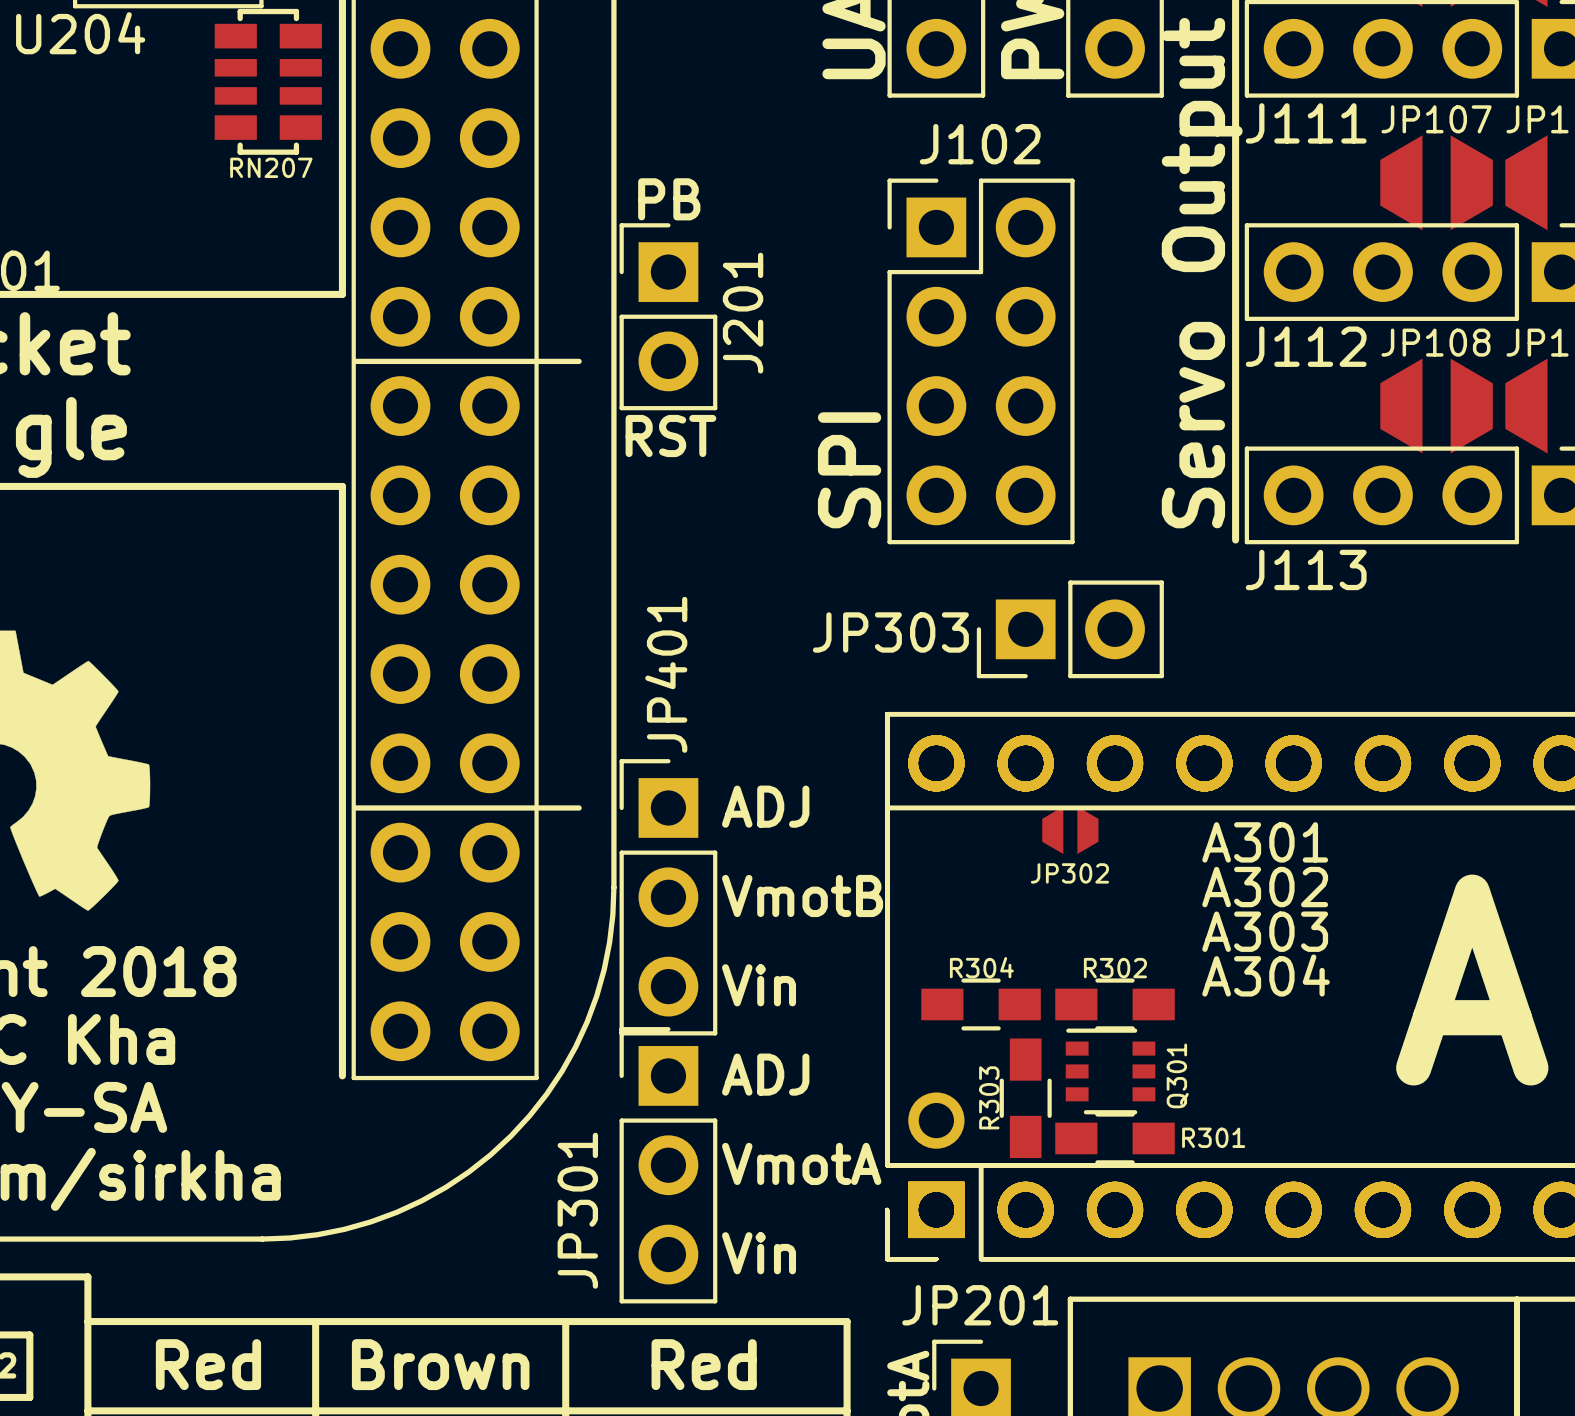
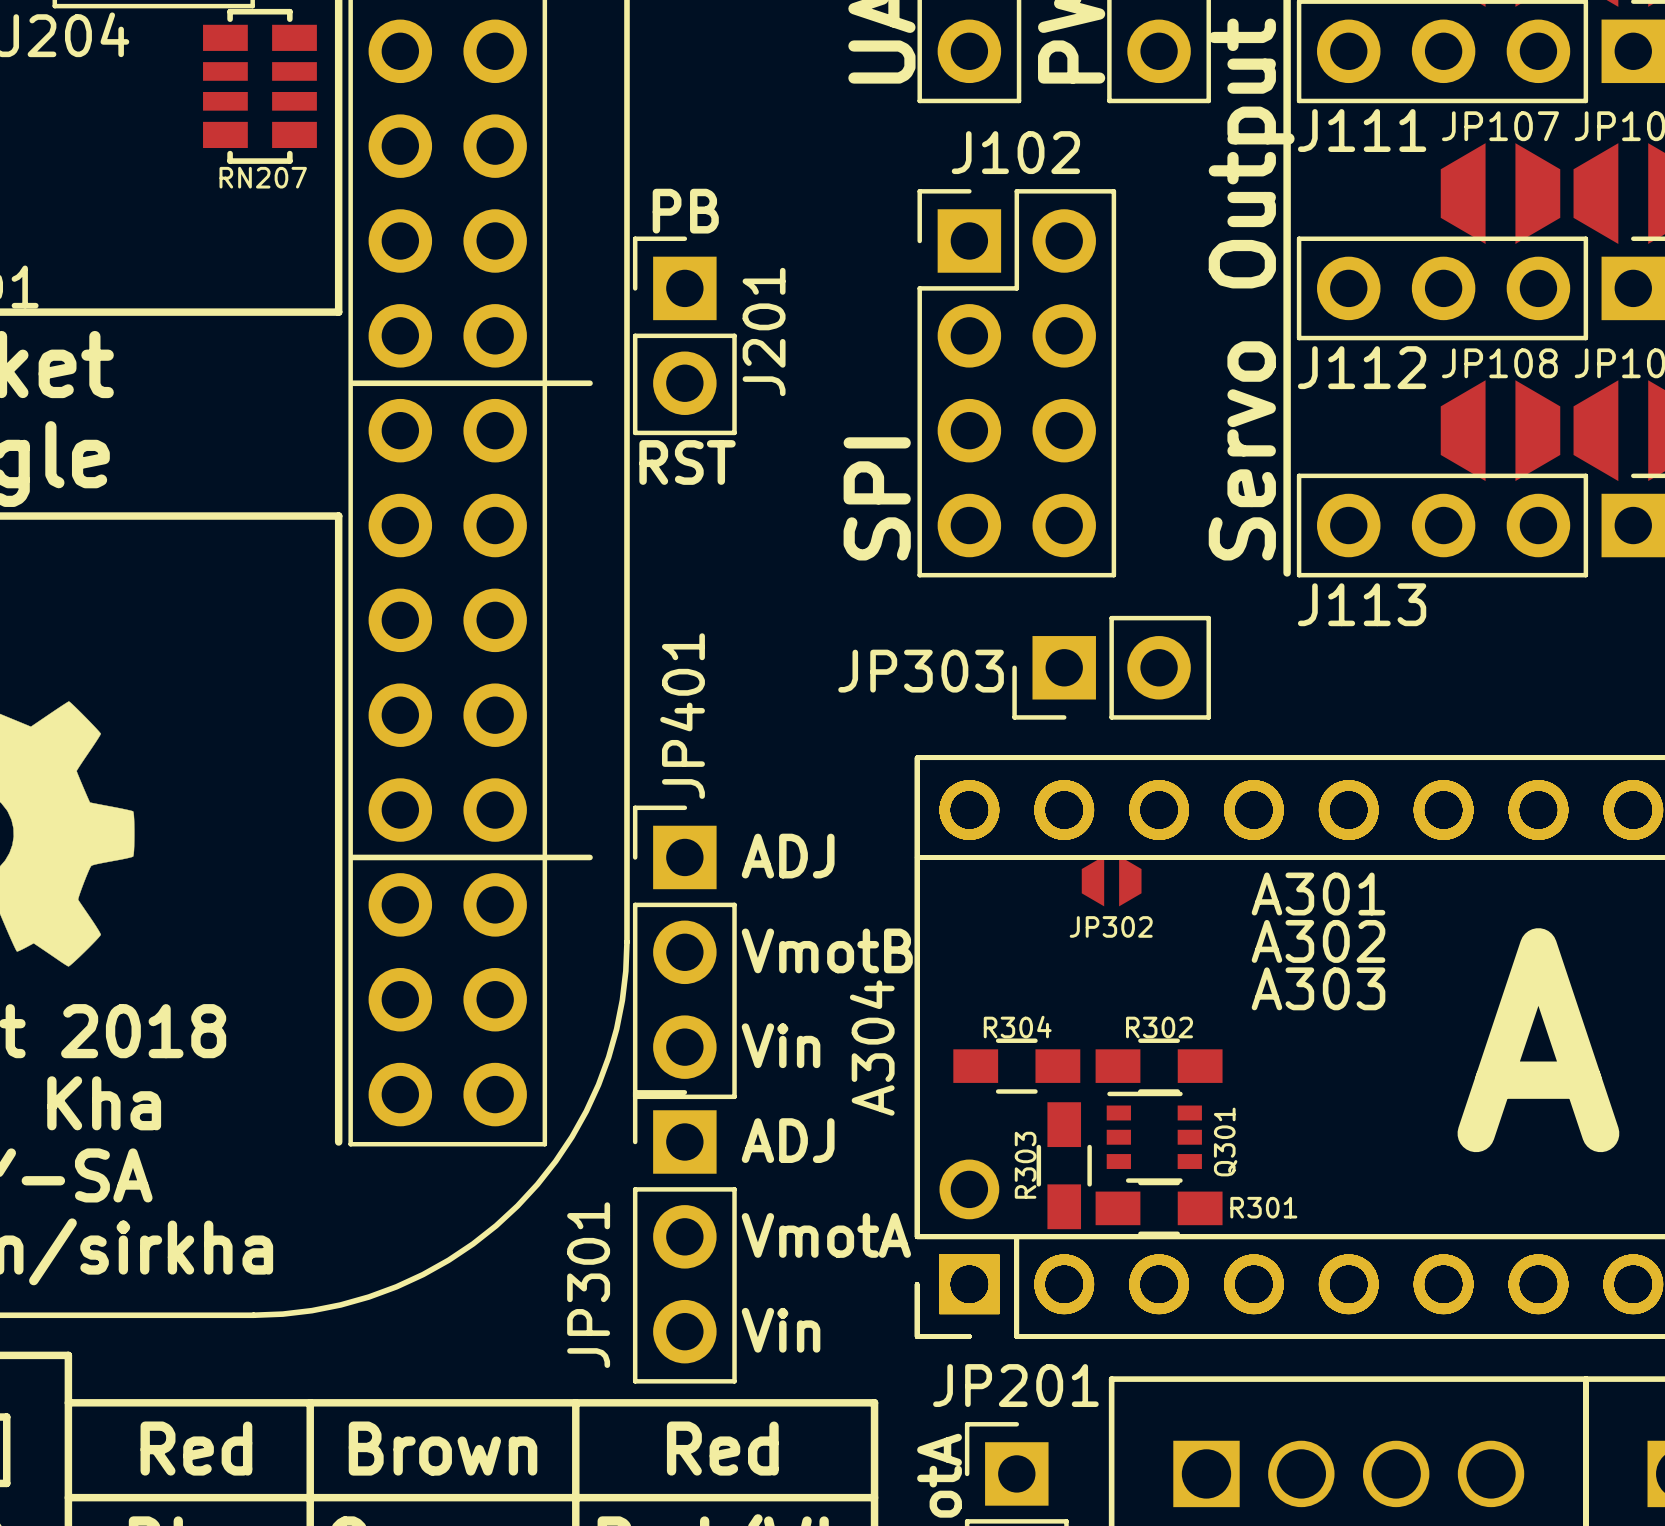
A304 name rotation: 0° (1266, 975) -> 90° counterclockwise (872, 1048)
A304 name position: A304 (1266, 975) -> A304 (872, 1048)

